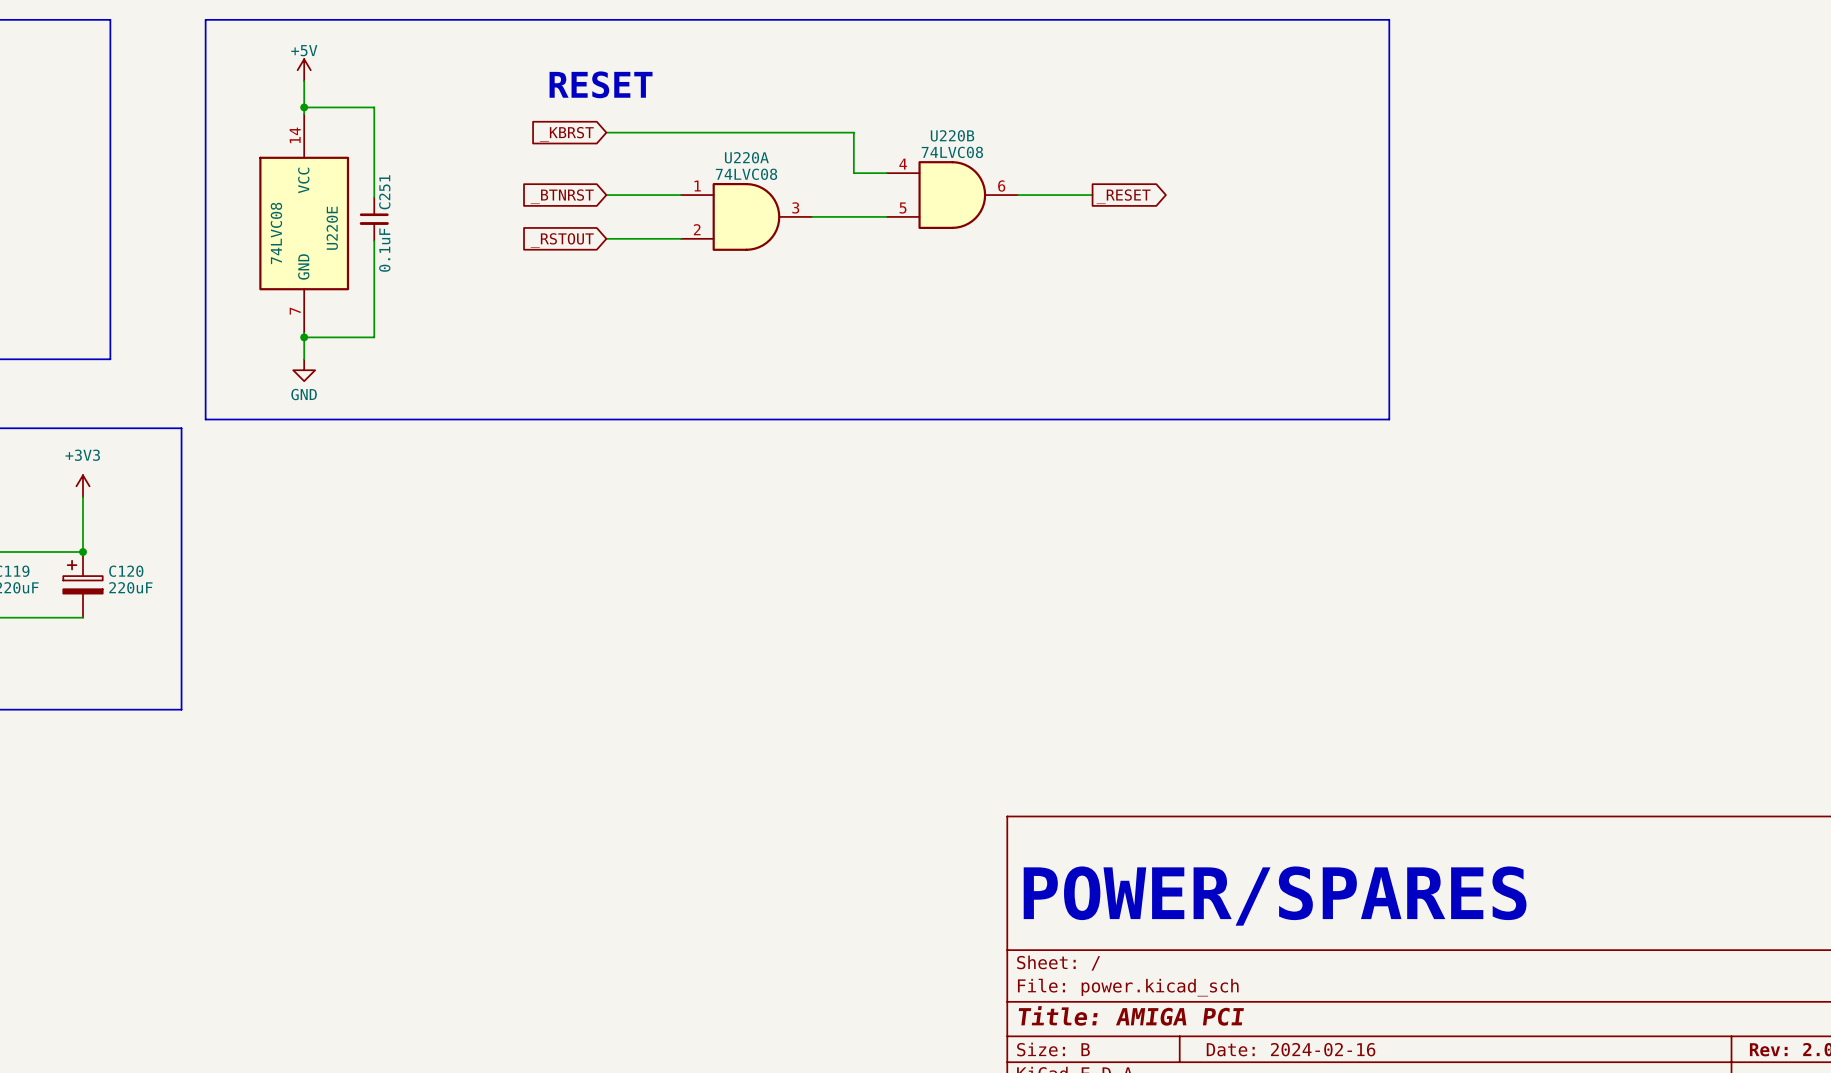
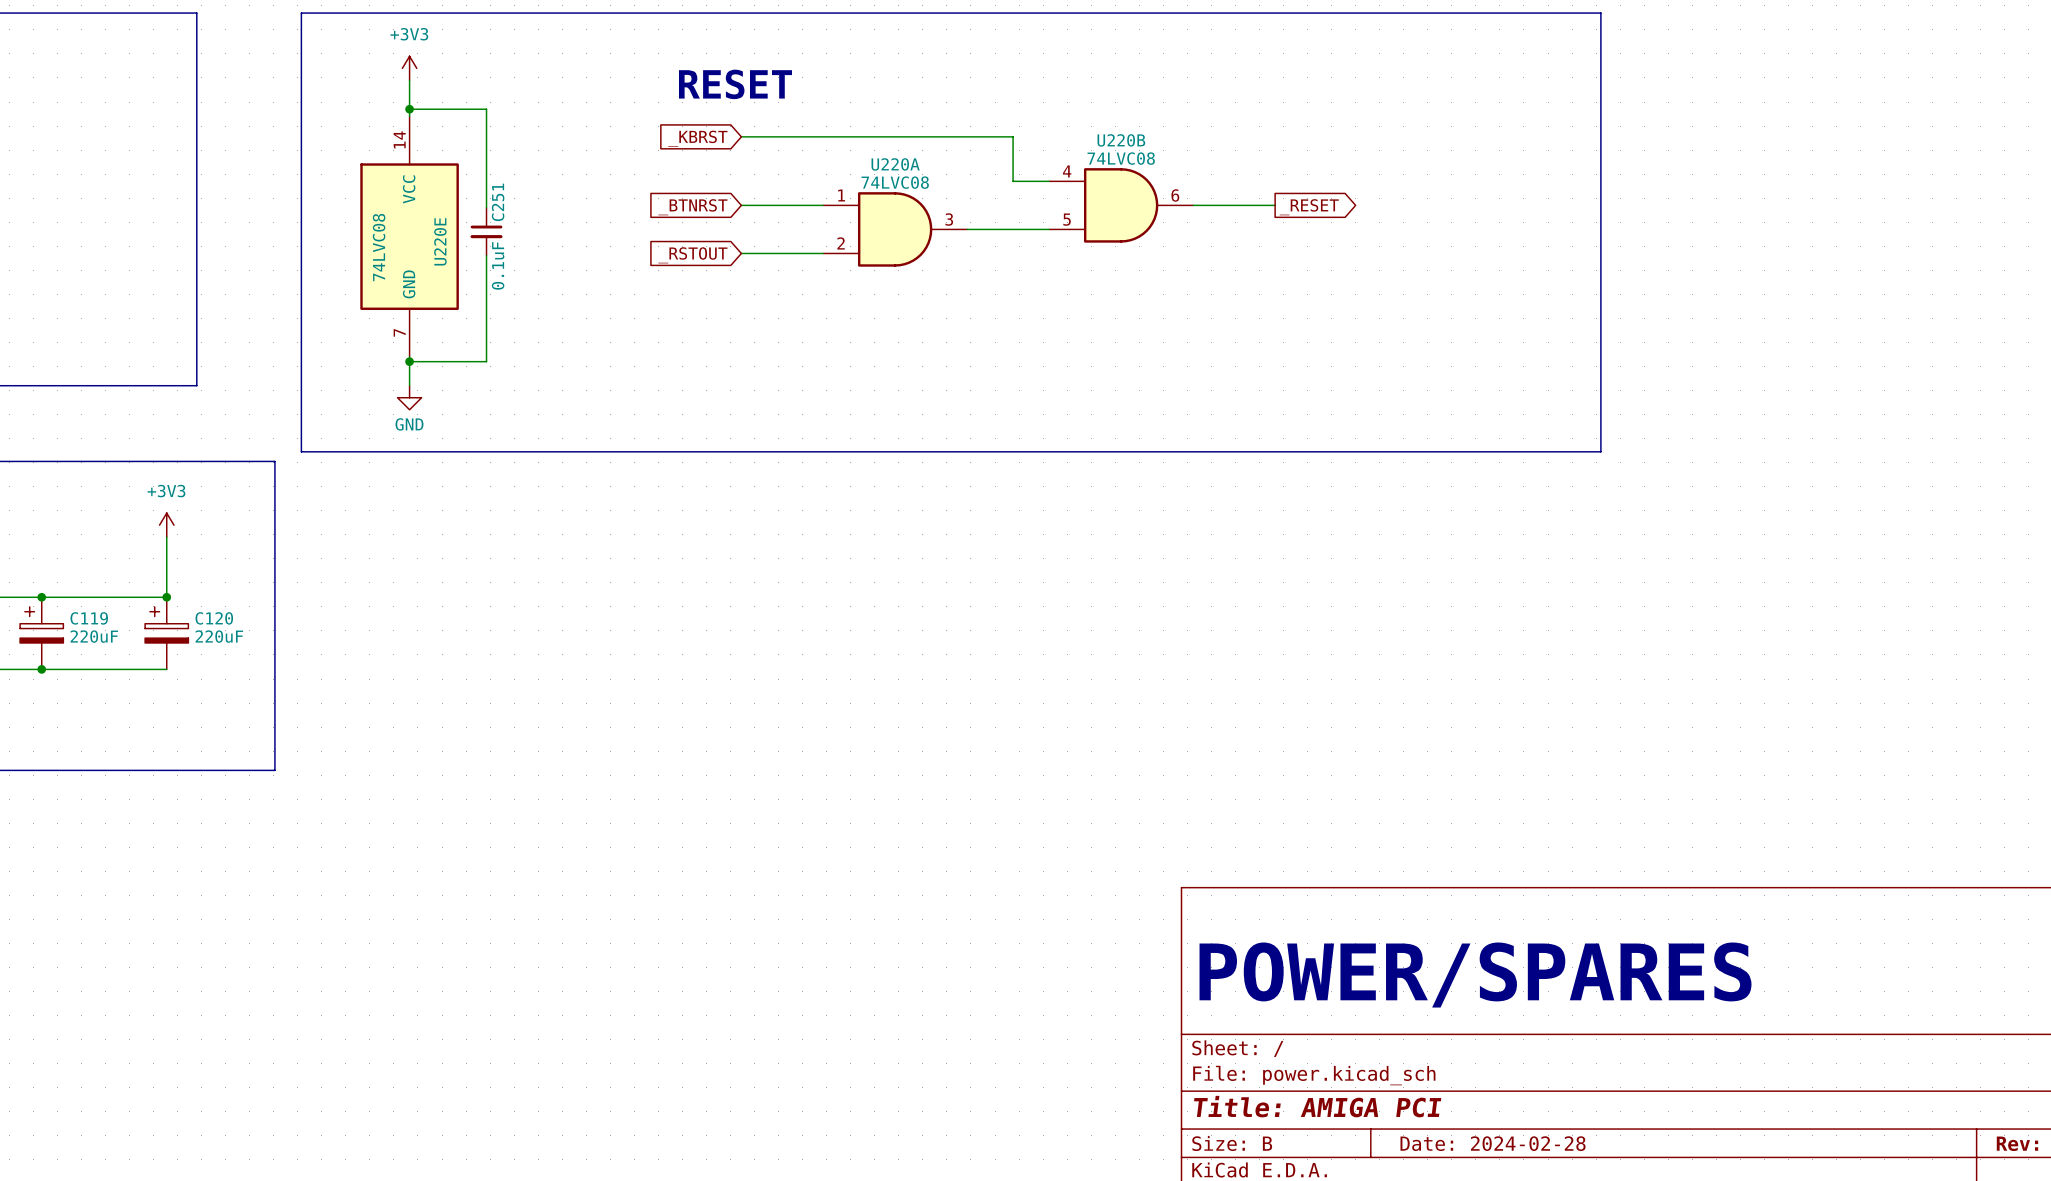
power symbol: +5V (304, 70) -> +3V3 (409, 68)
title block: Date: 2024-02-16 (1291, 1049) -> Date: 2024-02-28 (1493, 1143)

